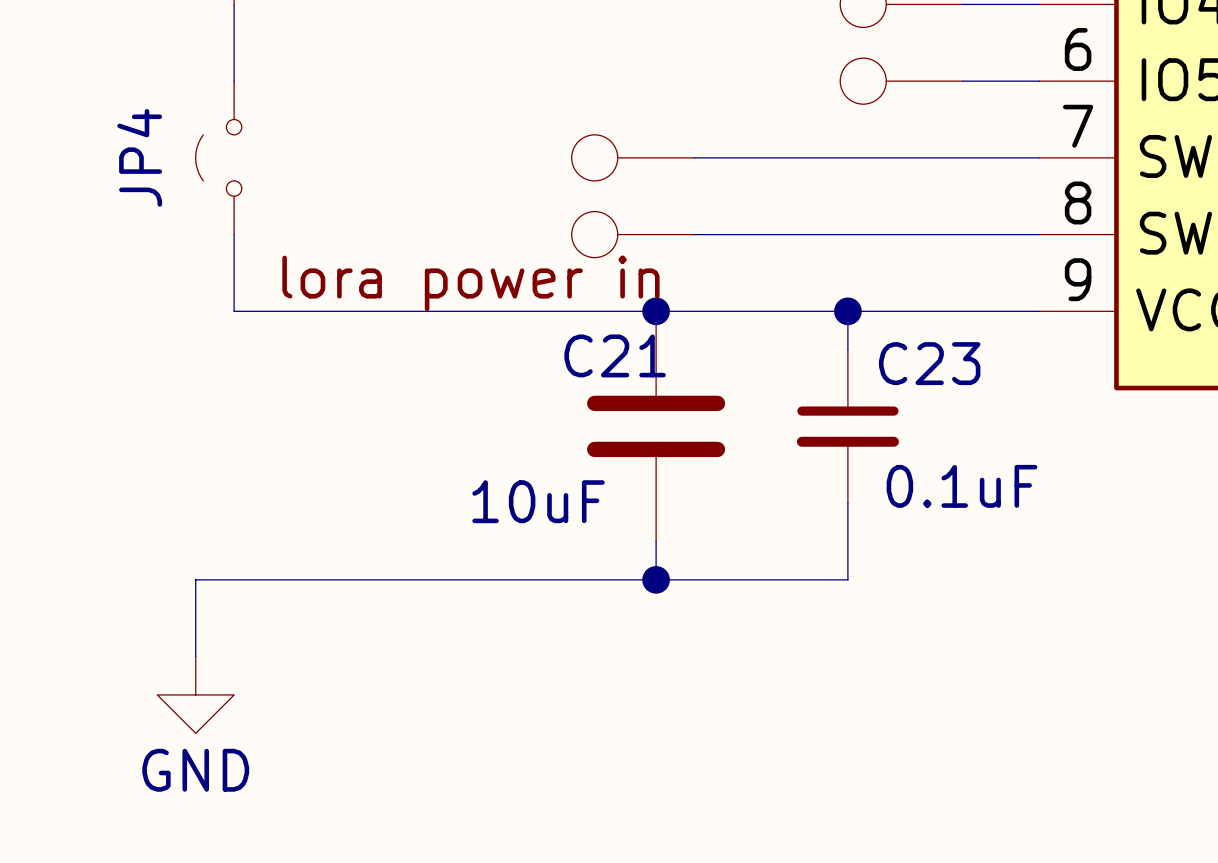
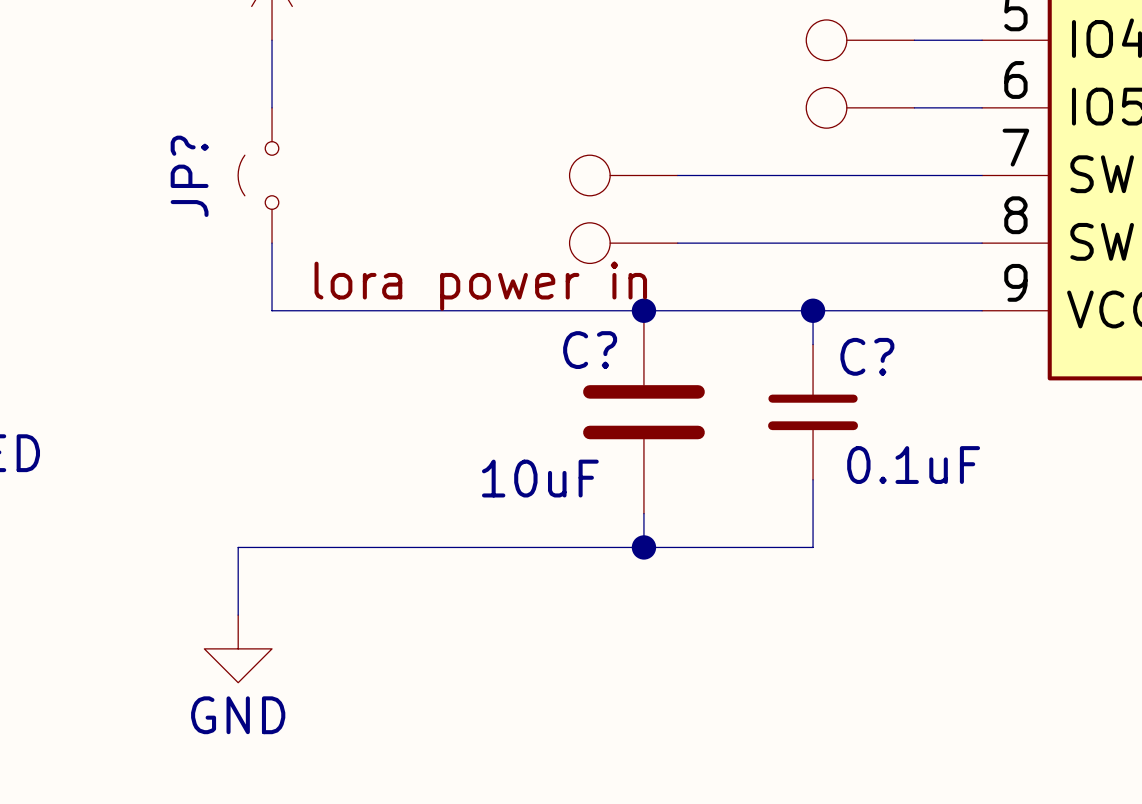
JP4 name: JP4 (139, 157) -> JP? (189, 176)
C21 name: C21 (615, 355) -> C? (590, 350)
C23 name: C23 (929, 363) -> C? (867, 356)

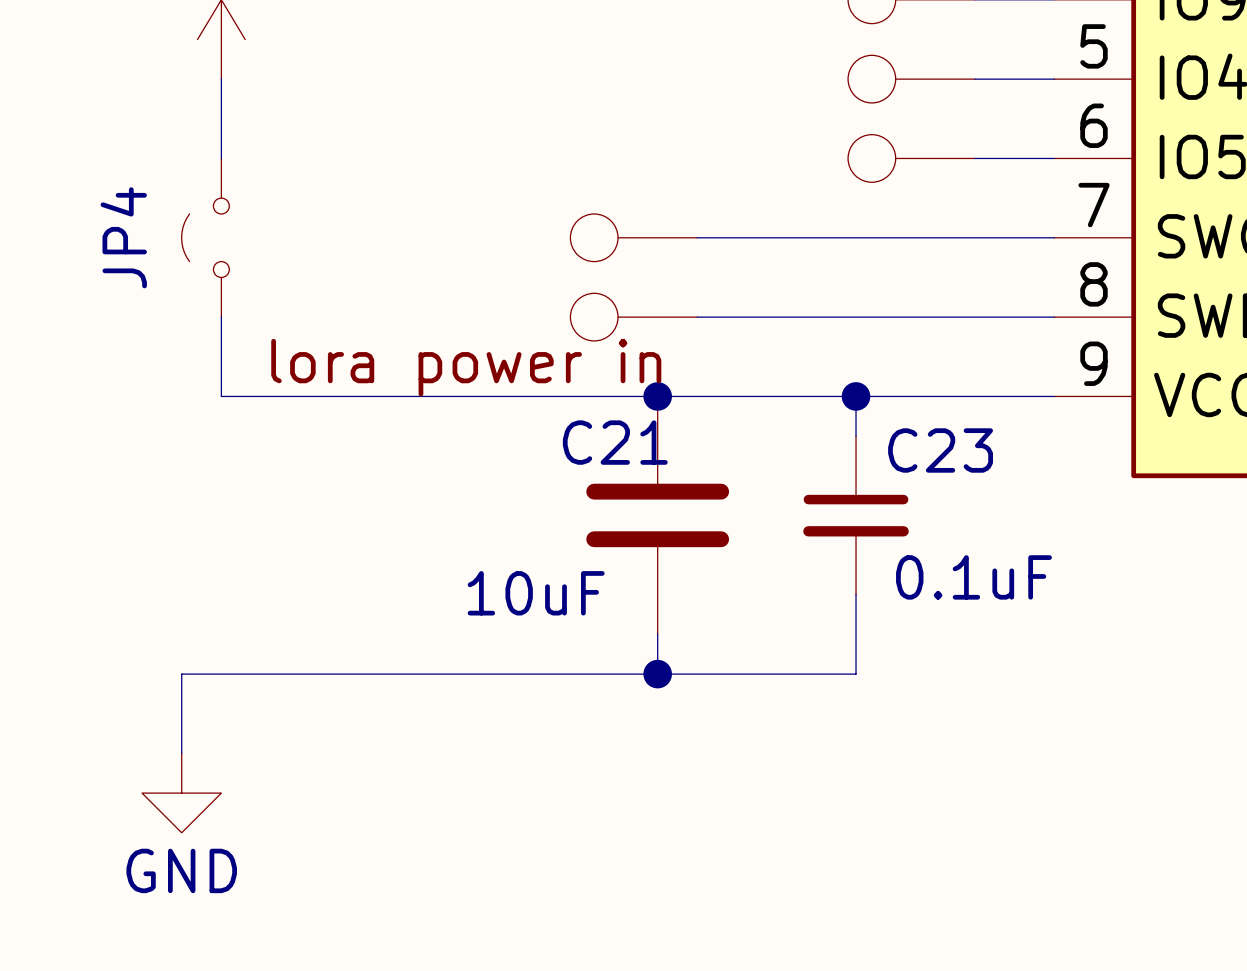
JP? name: JP? (189, 176) -> JP4 (123, 237)
C? name: C? (590, 350) -> C21 (615, 442)
C? name: C? (867, 356) -> C23 (940, 450)

